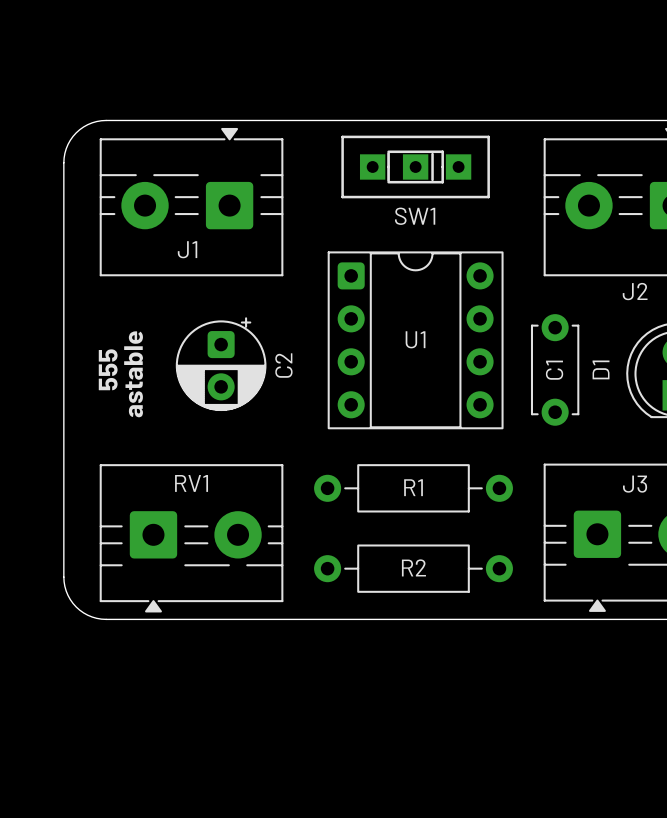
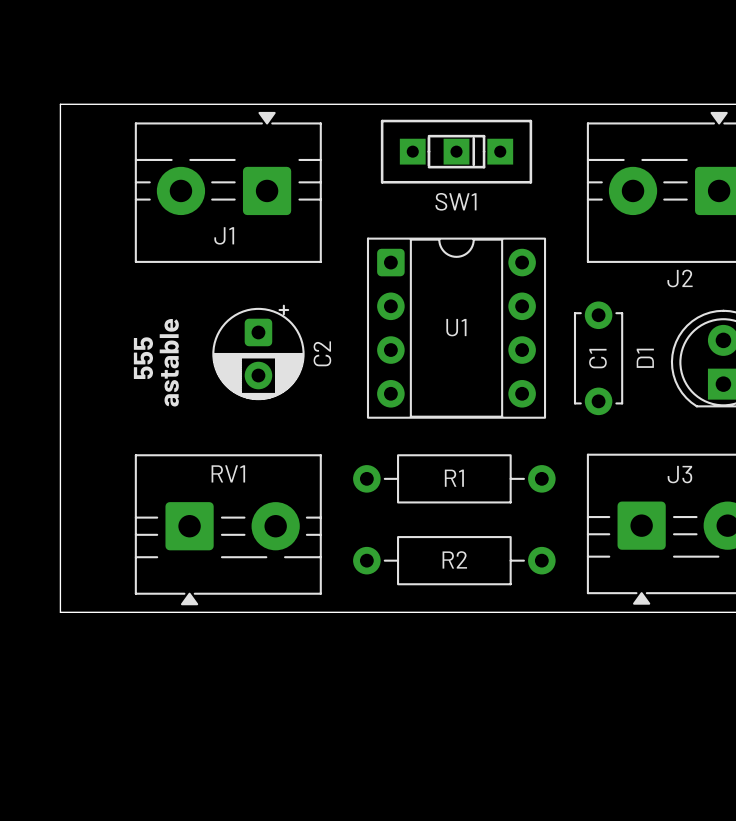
board edge: (106, 120) (87, 124) (76, 132) (66, 148) (63, 162) (64, 581) (68, 595) (76, 607) (92, 617) (106, 619) -> (141, 104) (60, 104) (60, 612) (141, 612)

